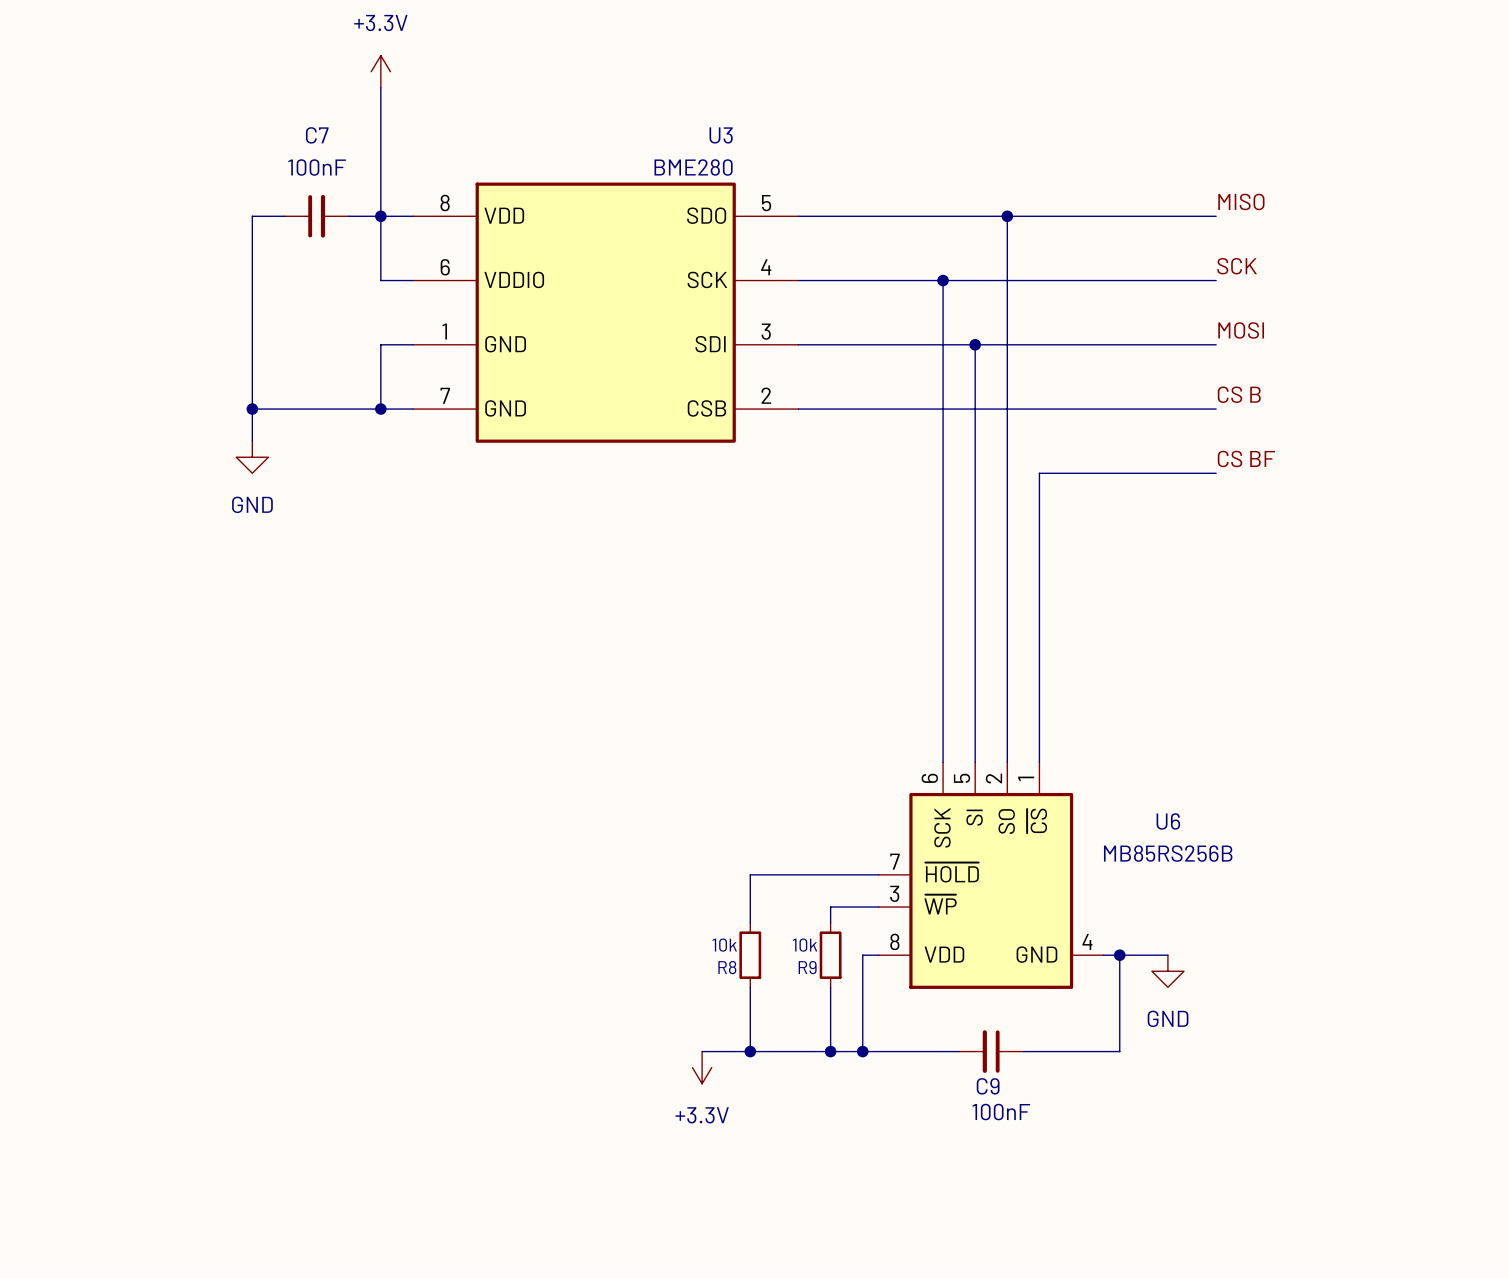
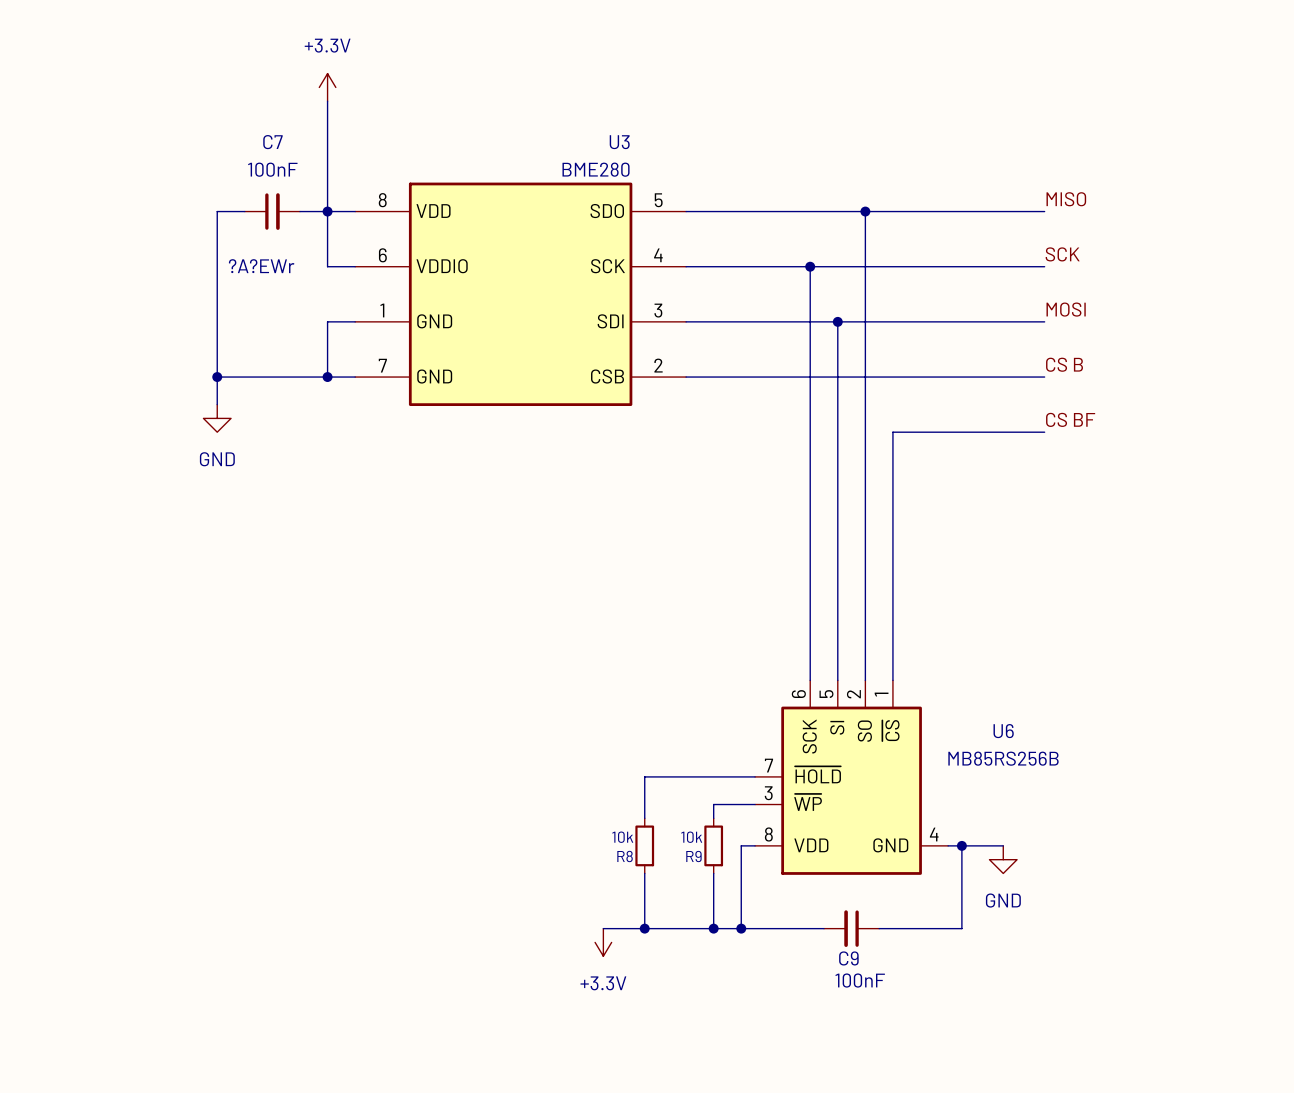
text: none -> ?A?EWr (261, 266)

